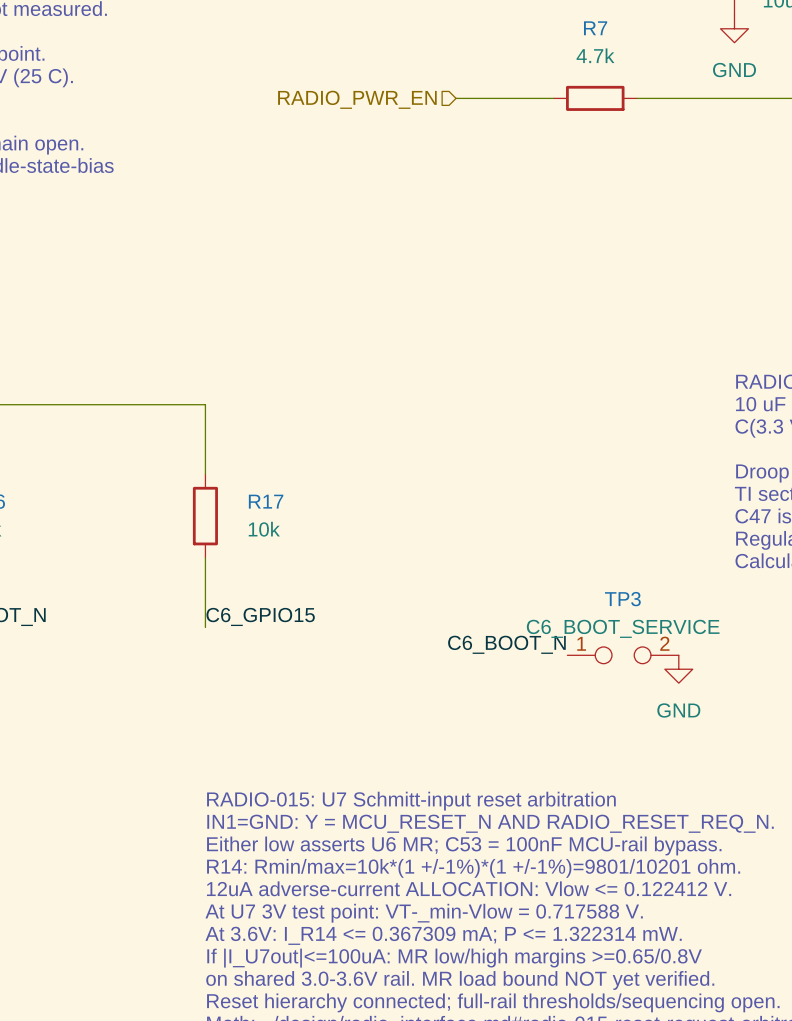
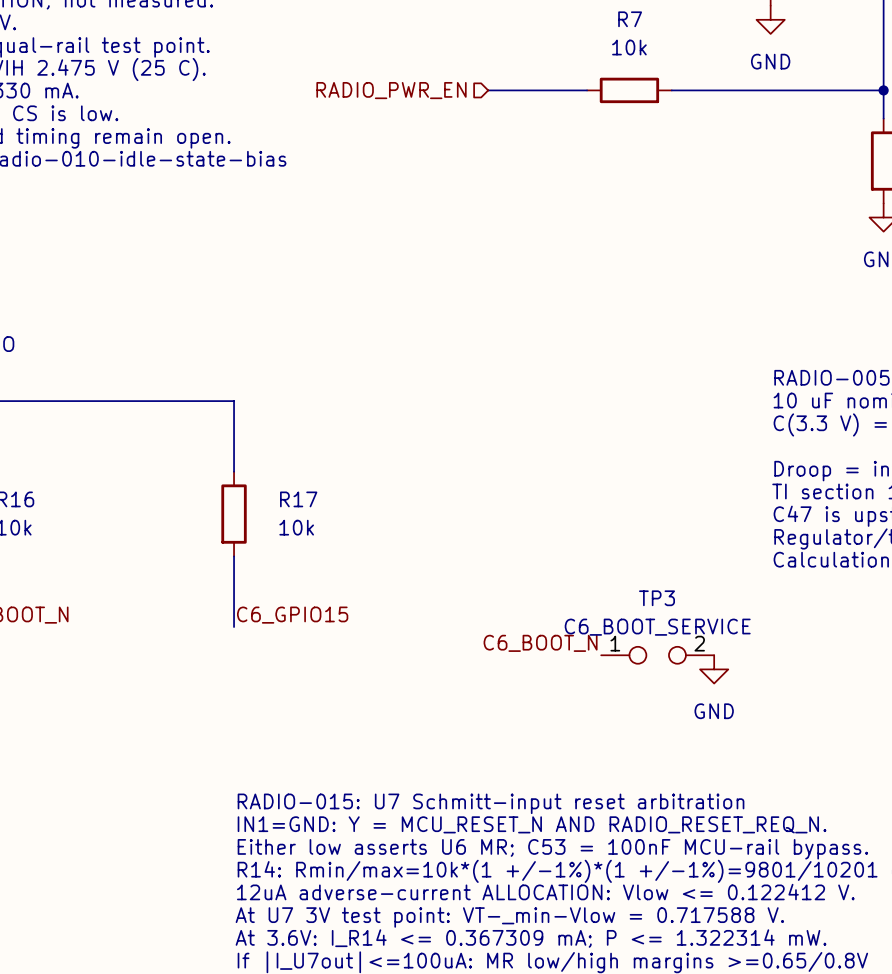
R7 value: 4.7k (595, 55) -> 10k (629, 47)

